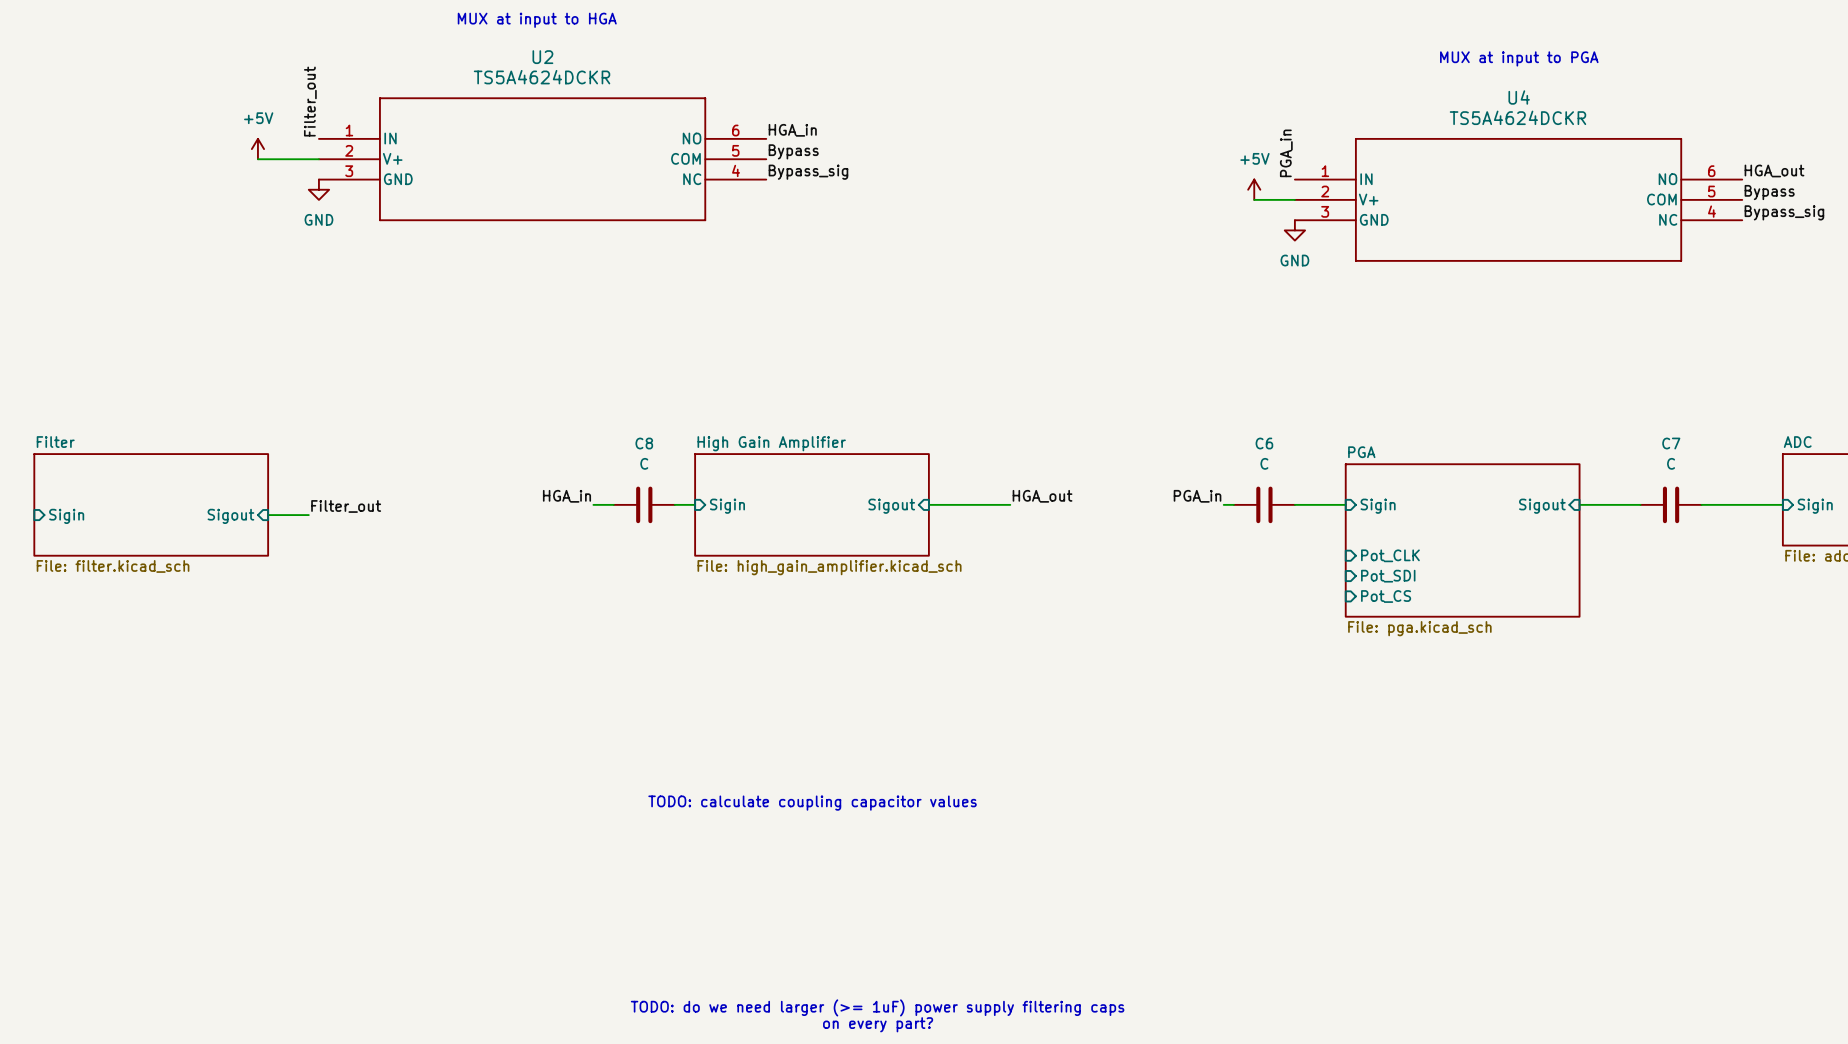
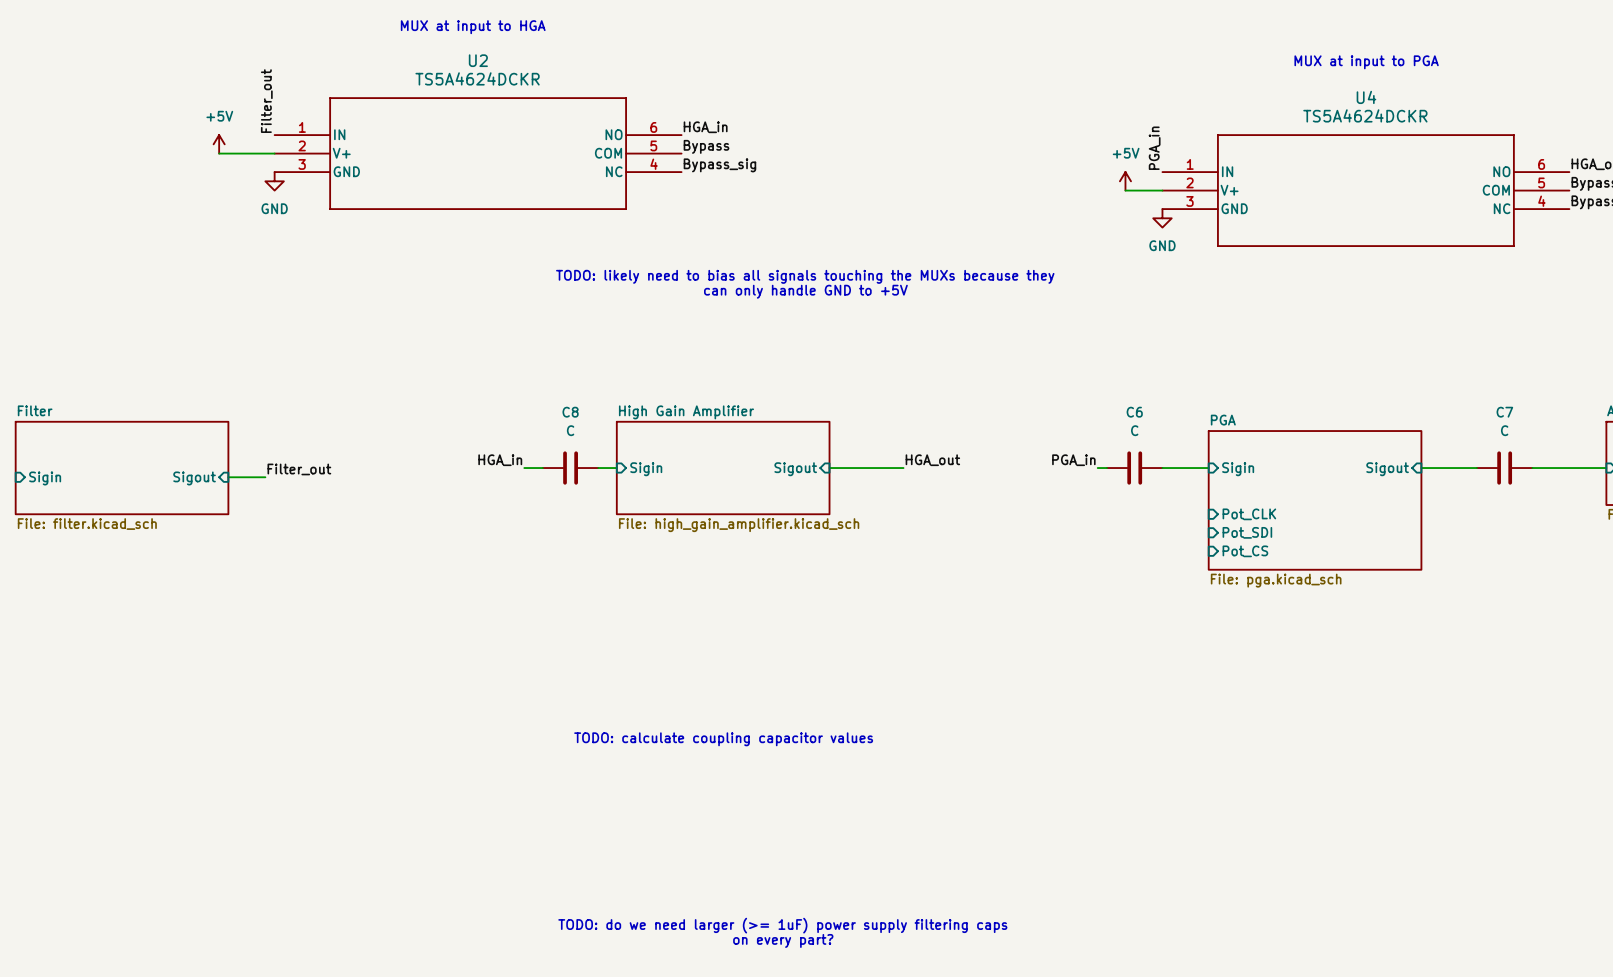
text: none -> TODO: likely need to bias all signals touching the MUXs because they (805, 276)
text: none -> can only handle GND to +5V (805, 291)

